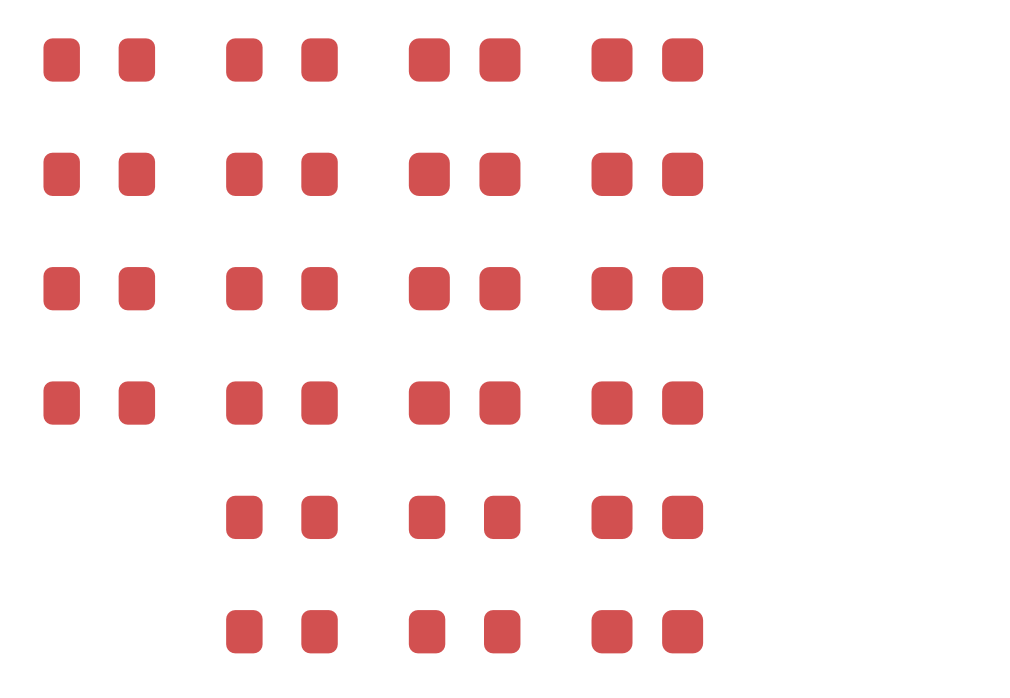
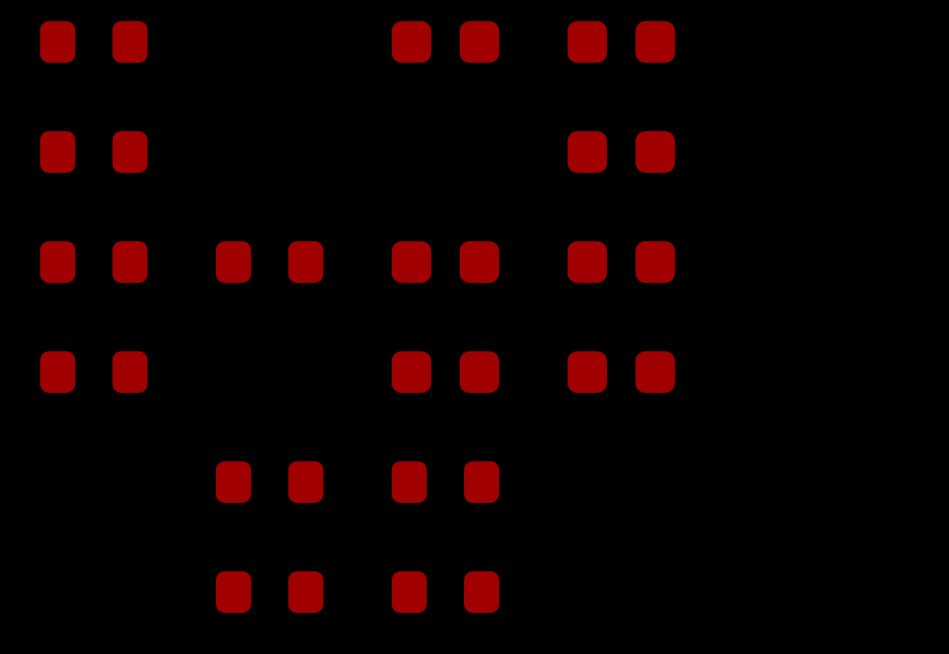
part: (281, 59) -> none
part: (281, 174) -> none
part: (464, 174) -> none
part: (281, 403) -> none
part: (647, 517) -> none
part: (647, 631) -> none

